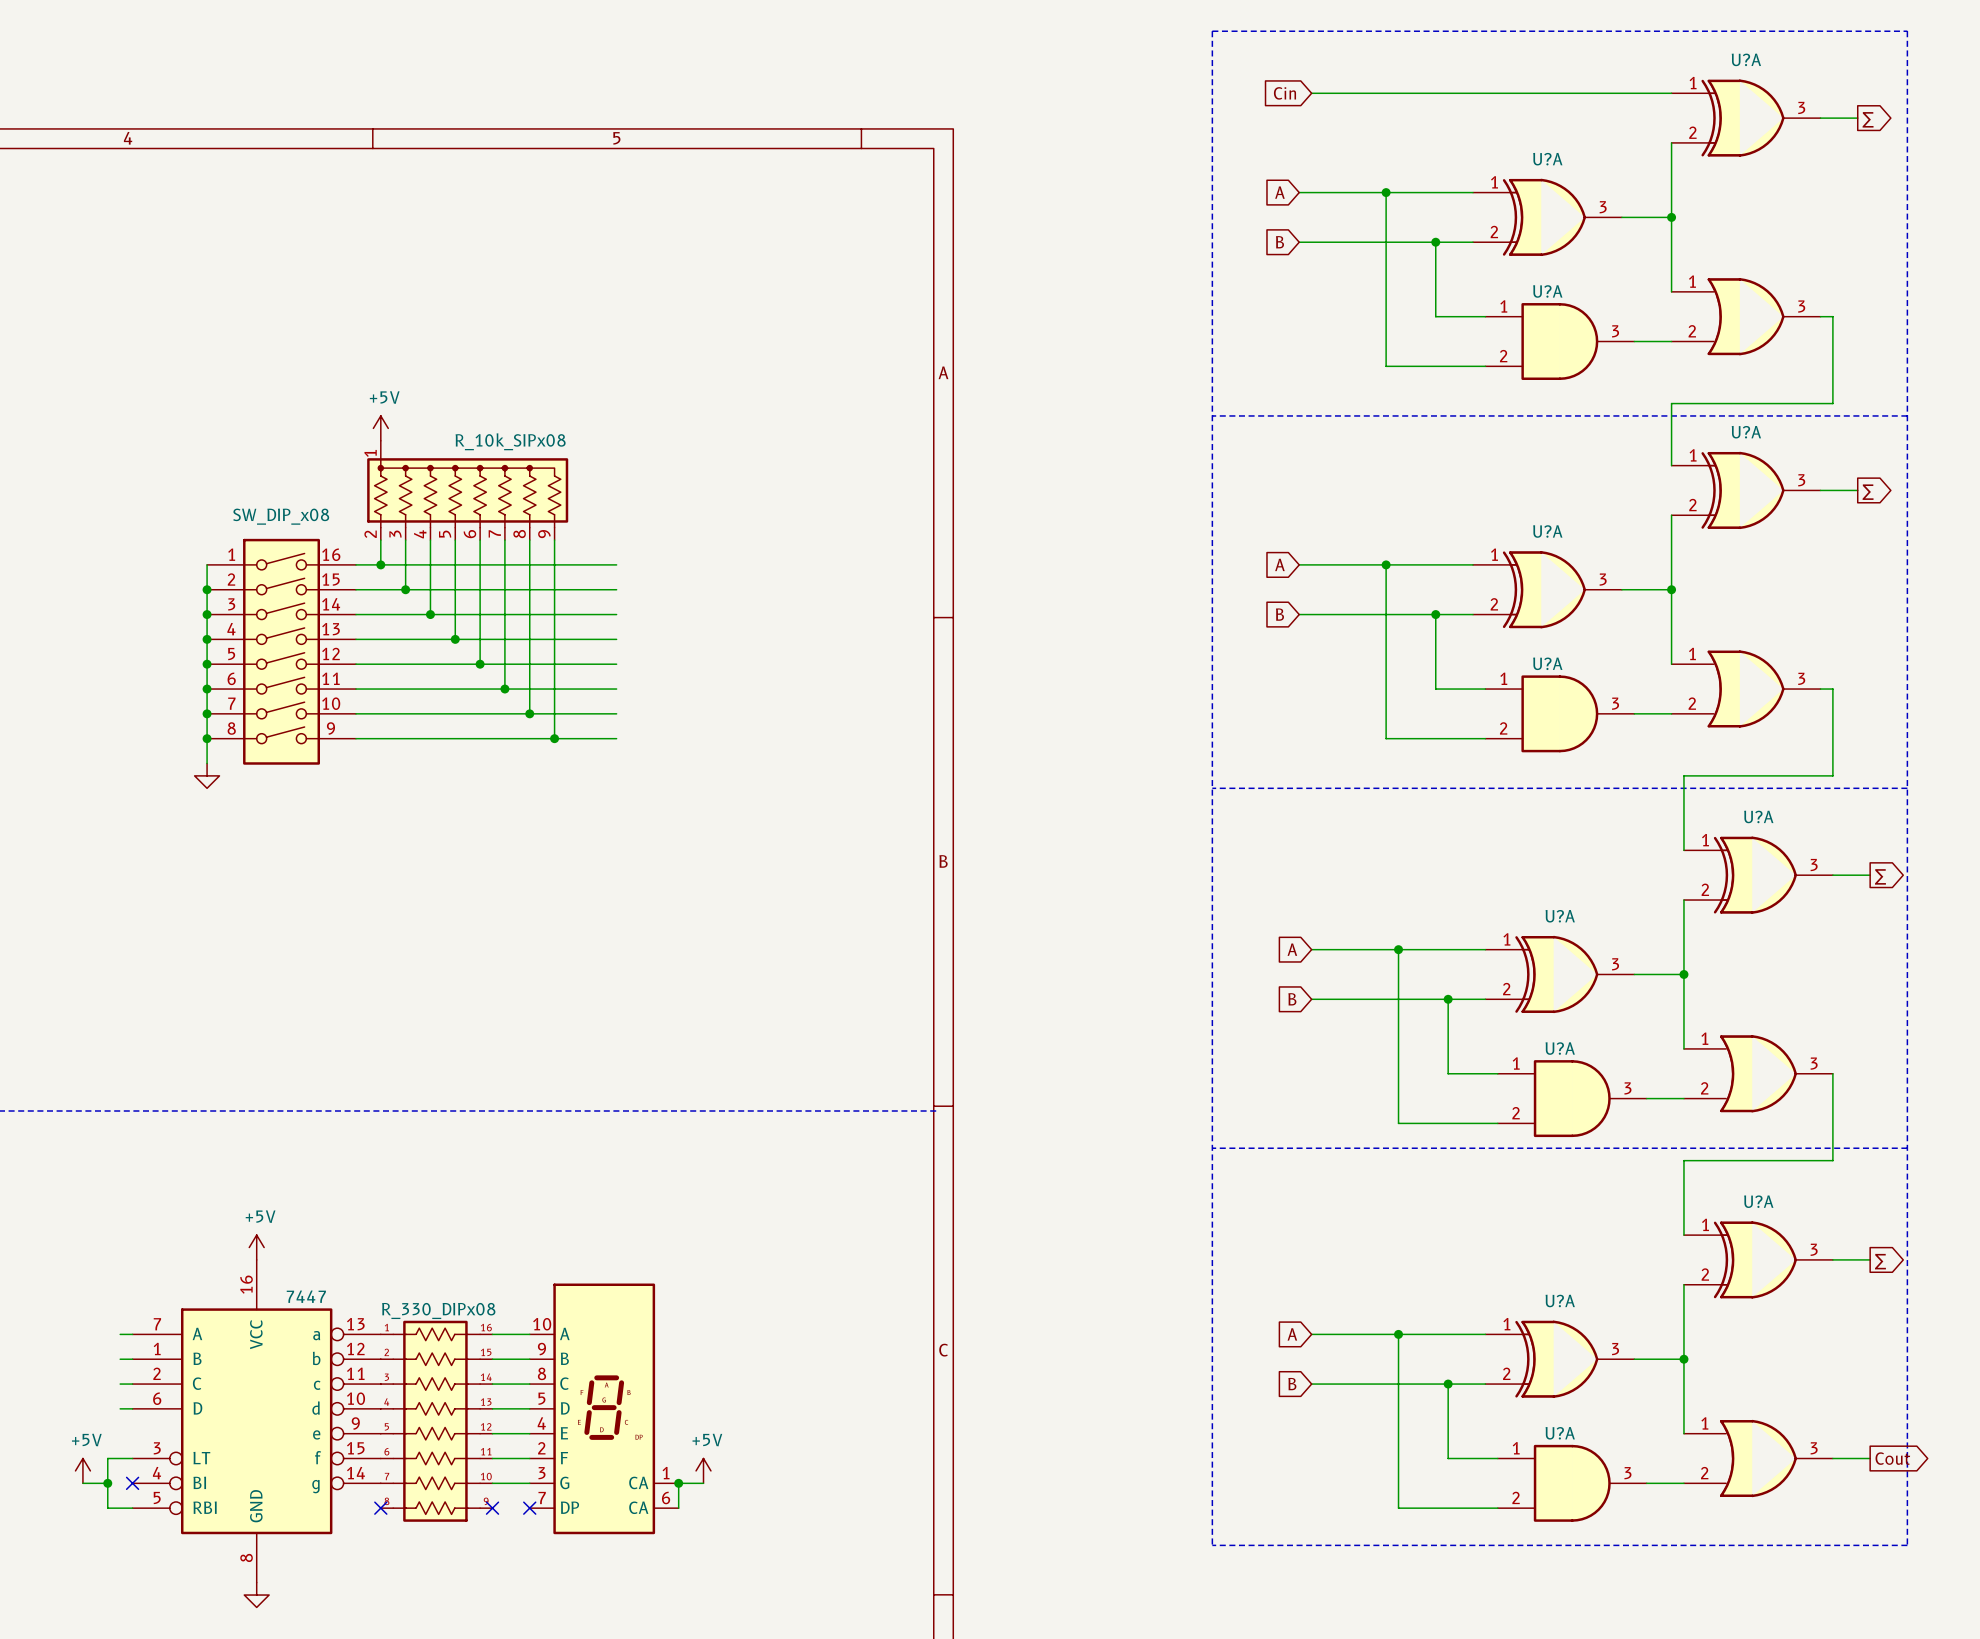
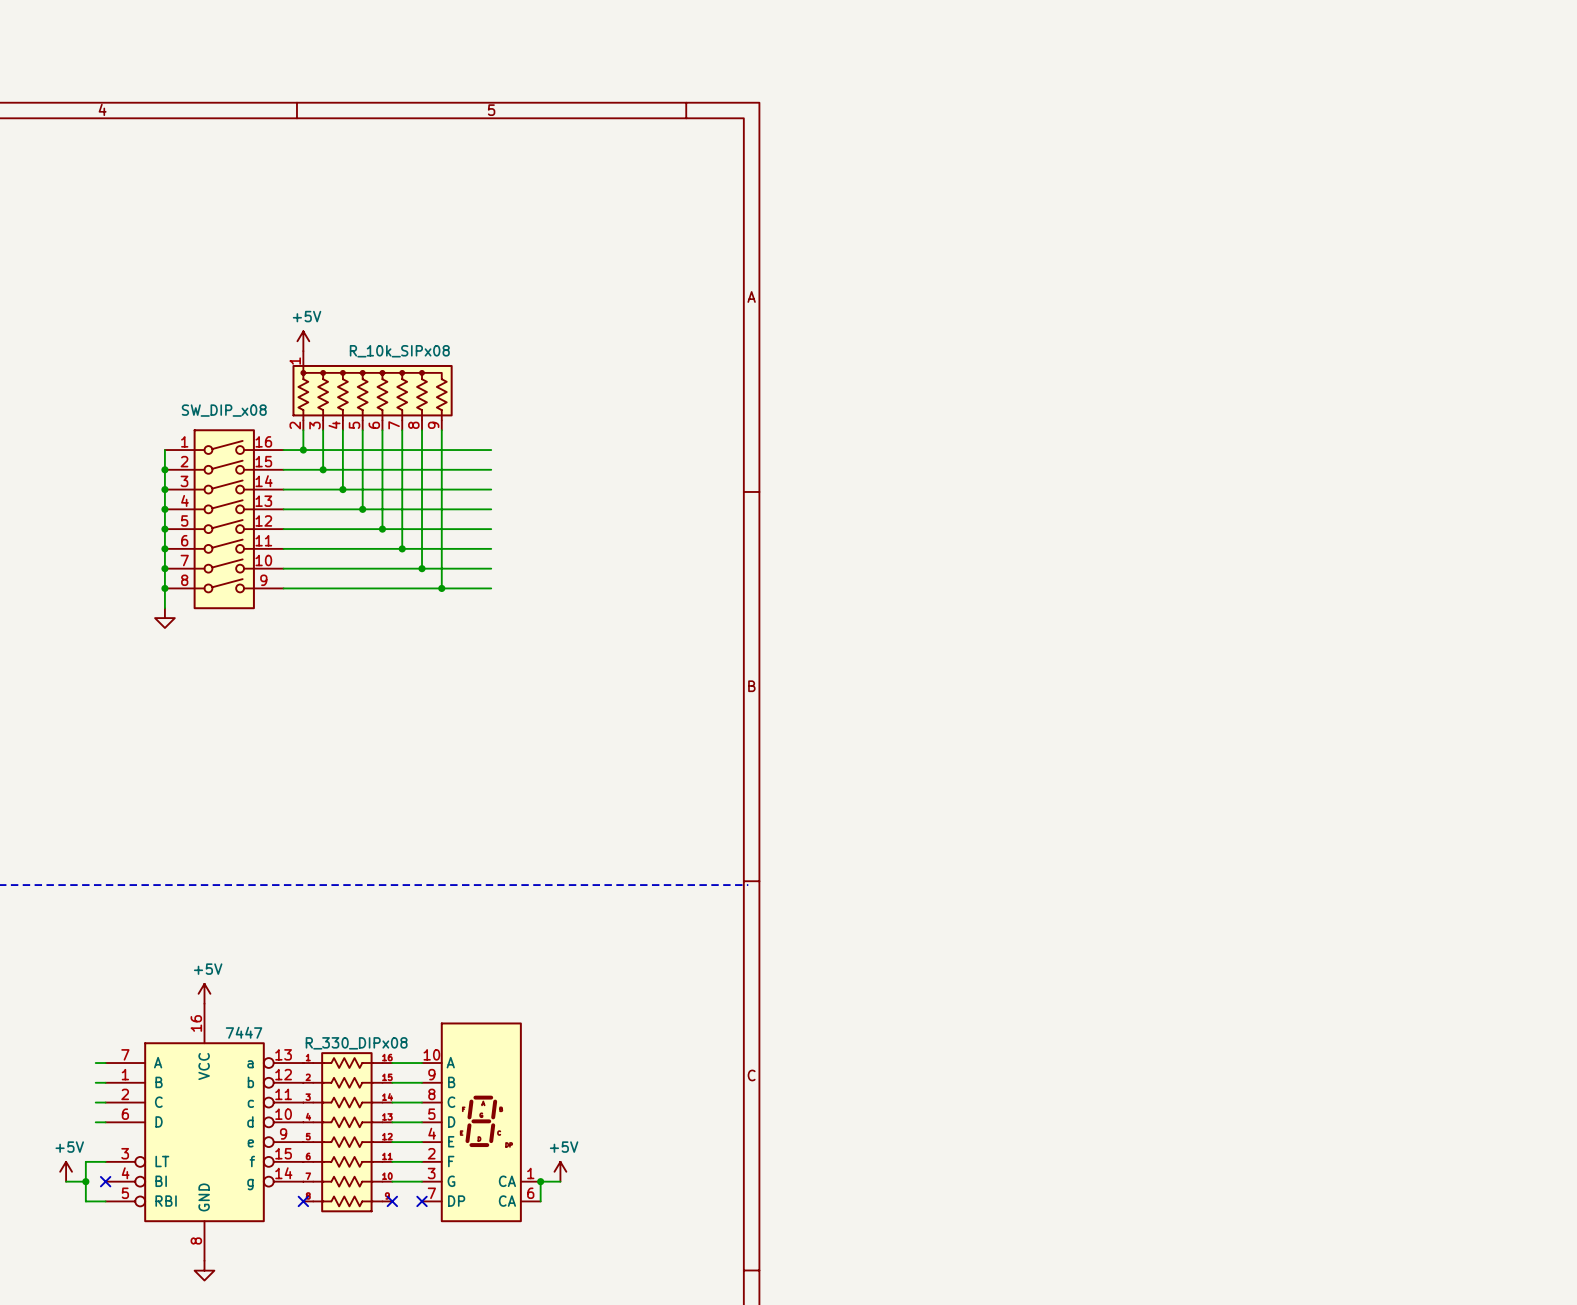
line: (1212, 31) (1907, 31) (1907, 1545) (1212, 1545) (1212, 31) -> none
global label: Cin (1284, 93) -> none
wire: (1311, 93) (1671, 93) -> none
U?A: (1746, 118) -> none
wire: (1820, 118) (1857, 118) -> none
global label: ∑ (1868, 119) -> none
wire: (1671, 142) (1671, 291) -> none
global label: A (1279, 192) -> none
wire: (1299, 192) (1472, 192) -> none
wire: (1386, 192) (1386, 366) (1485, 366) -> none
junction: (1386, 192) -> none
U?A: (1547, 217) -> none
wire: (1621, 217) (1671, 217) -> none
junction: (1671, 217) -> none
global label: B (1279, 242) -> none
wire: (1299, 242) (1472, 242) -> none
wire: (1435, 242) (1435, 316) (1485, 316) -> none
junction: (1435, 242) -> none
part: (1746, 316) -> none
wire: (1820, 316) (1832, 316) (1832, 403) (1671, 403) (1671, 465) -> none
U?A: (1559, 341) -> none
wire: (1634, 341) (1671, 341) -> none
line: (1212, 415) (1907, 415) -> none
U?A: (1746, 490) -> none
wire: (1820, 490) (1857, 490) -> none
global label: ∑ (1868, 492) -> none
wire: (1671, 515) (1671, 664) -> none
global label: A (1279, 564) -> none
wire: (1299, 564) (1472, 564) -> none
wire: (1386, 564) (1386, 738) (1485, 738) -> none
junction: (1386, 564) -> none
U?A: (1547, 589) -> none
wire: (1621, 589) (1671, 589) -> none
junction: (1671, 589) -> none
global label: B (1279, 614) -> none
wire: (1299, 614) (1472, 614) -> none
wire: (1435, 614) (1435, 689) (1485, 689) -> none
junction: (1435, 614) -> none
part: (1746, 689) -> none
wire: (1820, 689) (1832, 689) (1832, 775) (1683, 775) (1683, 850) -> none
U?A: (1559, 713) -> none
wire: (1634, 713) (1671, 713) -> none
line: (1212, 788) (1907, 788) -> none
U?A: (1758, 875) -> none
wire: (1832, 875) (1870, 875) -> none
global label: ∑ (1880, 876) -> none
wire: (1683, 900) (1683, 1048) -> none
global label: A (1292, 949) -> none
wire: (1311, 949) (1485, 949) -> none
wire: (1398, 949) (1398, 1123) (1497, 1123) -> none
junction: (1398, 949) -> none
U?A: (1559, 974) -> none
wire: (1634, 974) (1683, 974) -> none
junction: (1683, 974) -> none
global label: B (1292, 999) -> none
wire: (1311, 999) (1485, 999) -> none
wire: (1448, 999) (1448, 1073) (1497, 1073) -> none
junction: (1448, 999) -> none
part: (1758, 1073) -> none
wire: (1832, 1073) (1832, 1160) (1683, 1160) (1683, 1235) -> none
U?A: (1572, 1098) -> none
wire: (1646, 1098) (1683, 1098) -> none
line: (1212, 1148) (1907, 1148) -> none
U?A: (1758, 1259) -> none
wire: (1832, 1259) (1870, 1259) -> none
global label: ∑ (1880, 1261) -> none
wire: (1683, 1284) (1683, 1433) -> none
global label: A (1292, 1334) -> none
wire: (1311, 1334) (1485, 1334) -> none
wire: (1398, 1334) (1398, 1508) (1497, 1508) -> none
junction: (1398, 1334) -> none
U?A: (1559, 1359) -> none
wire: (1634, 1359) (1683, 1359) -> none
junction: (1683, 1359) -> none
global label: B (1292, 1384) -> none
wire: (1311, 1384) (1485, 1384) -> none
wire: (1448, 1384) (1448, 1458) (1497, 1458) -> none
junction: (1448, 1384) -> none
part: (1758, 1458) -> none
wire: (1832, 1458) (1870, 1458) -> none
global label: Cout (1892, 1458) -> none
U?A: (1572, 1483) -> none
wire: (1646, 1483) (1683, 1483) -> none

